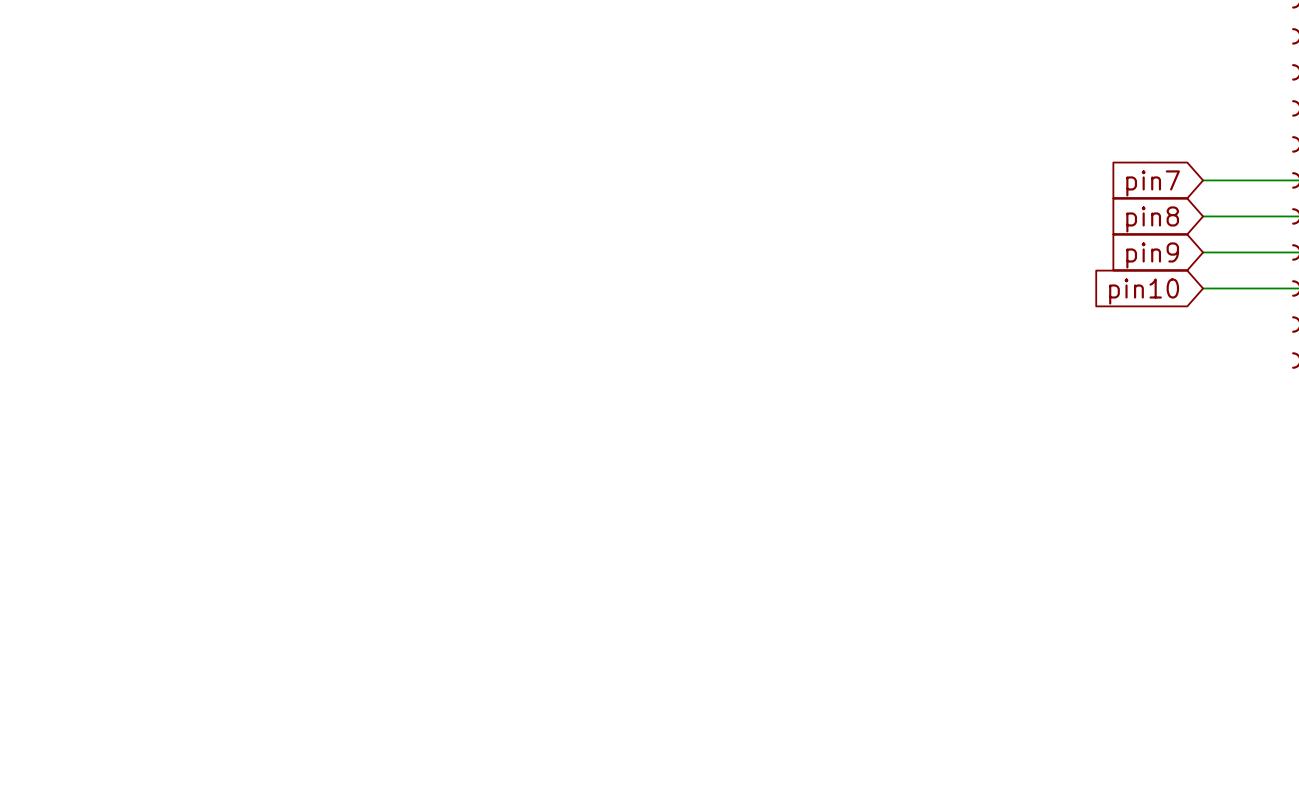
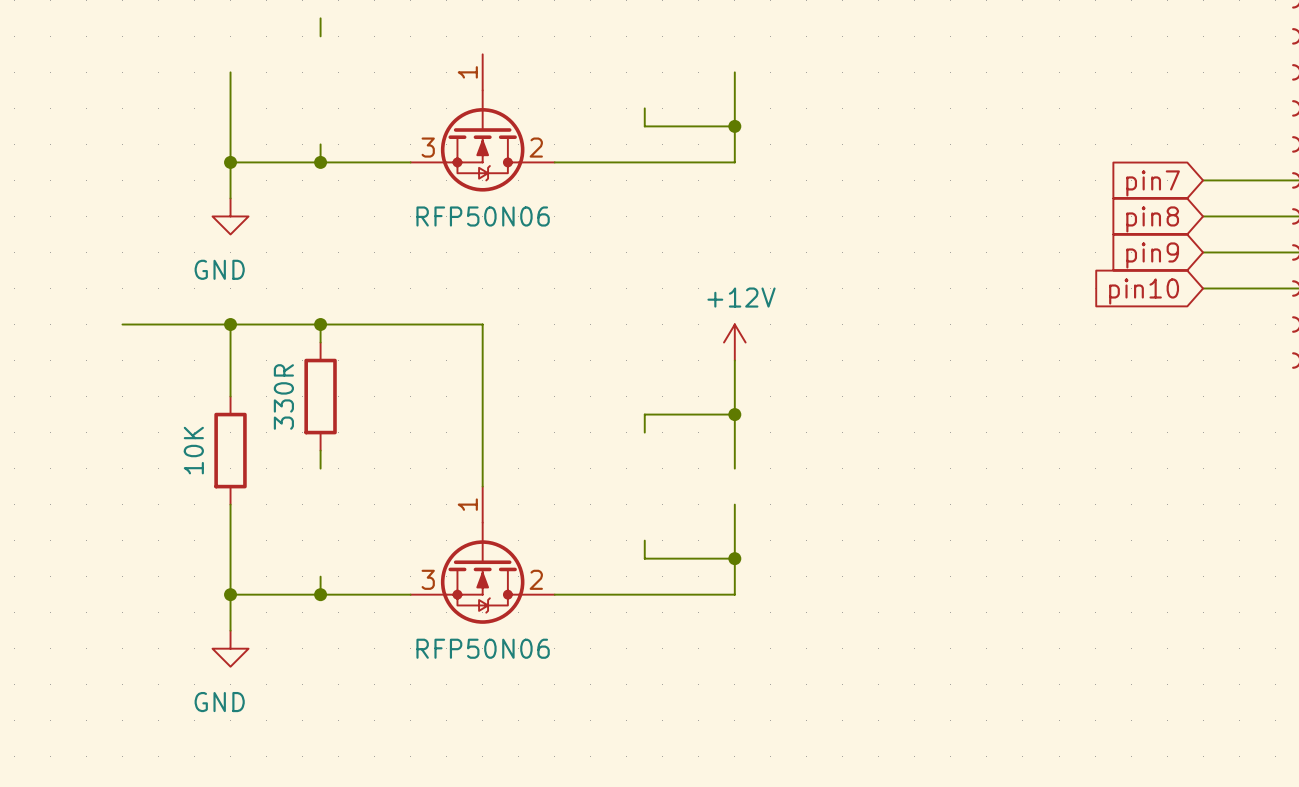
wire: none -> (320, 18) (320, 36)
wire: none -> (230, 72) (230, 198)
wire: none -> (734, 72) (734, 162) (554, 162)
wire: none -> (644, 108) (644, 126) (734, 126)
part: none -> RFP50N06 (482, 122)
junction: none -> (734, 126)
wire: none -> (320, 144) (320, 162)
wire: none -> (230, 162) (410, 162)
junction: none -> (230, 162)
junction: none -> (320, 162)
power symbol: none -> GND (230, 216)
wire: none -> (122, 324) (482, 324) (482, 486)
wire: none -> (230, 324) (230, 396)
junction: none -> (230, 324)
wire: none -> (320, 324) (320, 342)
junction: none -> (320, 324)
power symbol: none -> +12V (734, 342)
wire: none -> (734, 360) (734, 468)
part: none -> 330R (320, 396)
wire: none -> (734, 414) (644, 414) (644, 432)
junction: none -> (734, 414)
part: none -> 10K (230, 450)
wire: none -> (320, 450) (320, 468)
wire: none -> (230, 504) (230, 630)
wire: none -> (734, 504) (734, 594) (554, 594)
wire: none -> (644, 540) (644, 558) (734, 558)
part: none -> RFP50N06 (482, 555)
junction: none -> (734, 558)
wire: none -> (320, 576) (320, 594)
wire: none -> (230, 594) (410, 594)
junction: none -> (230, 594)
junction: none -> (320, 594)
power symbol: none -> GND (230, 648)

